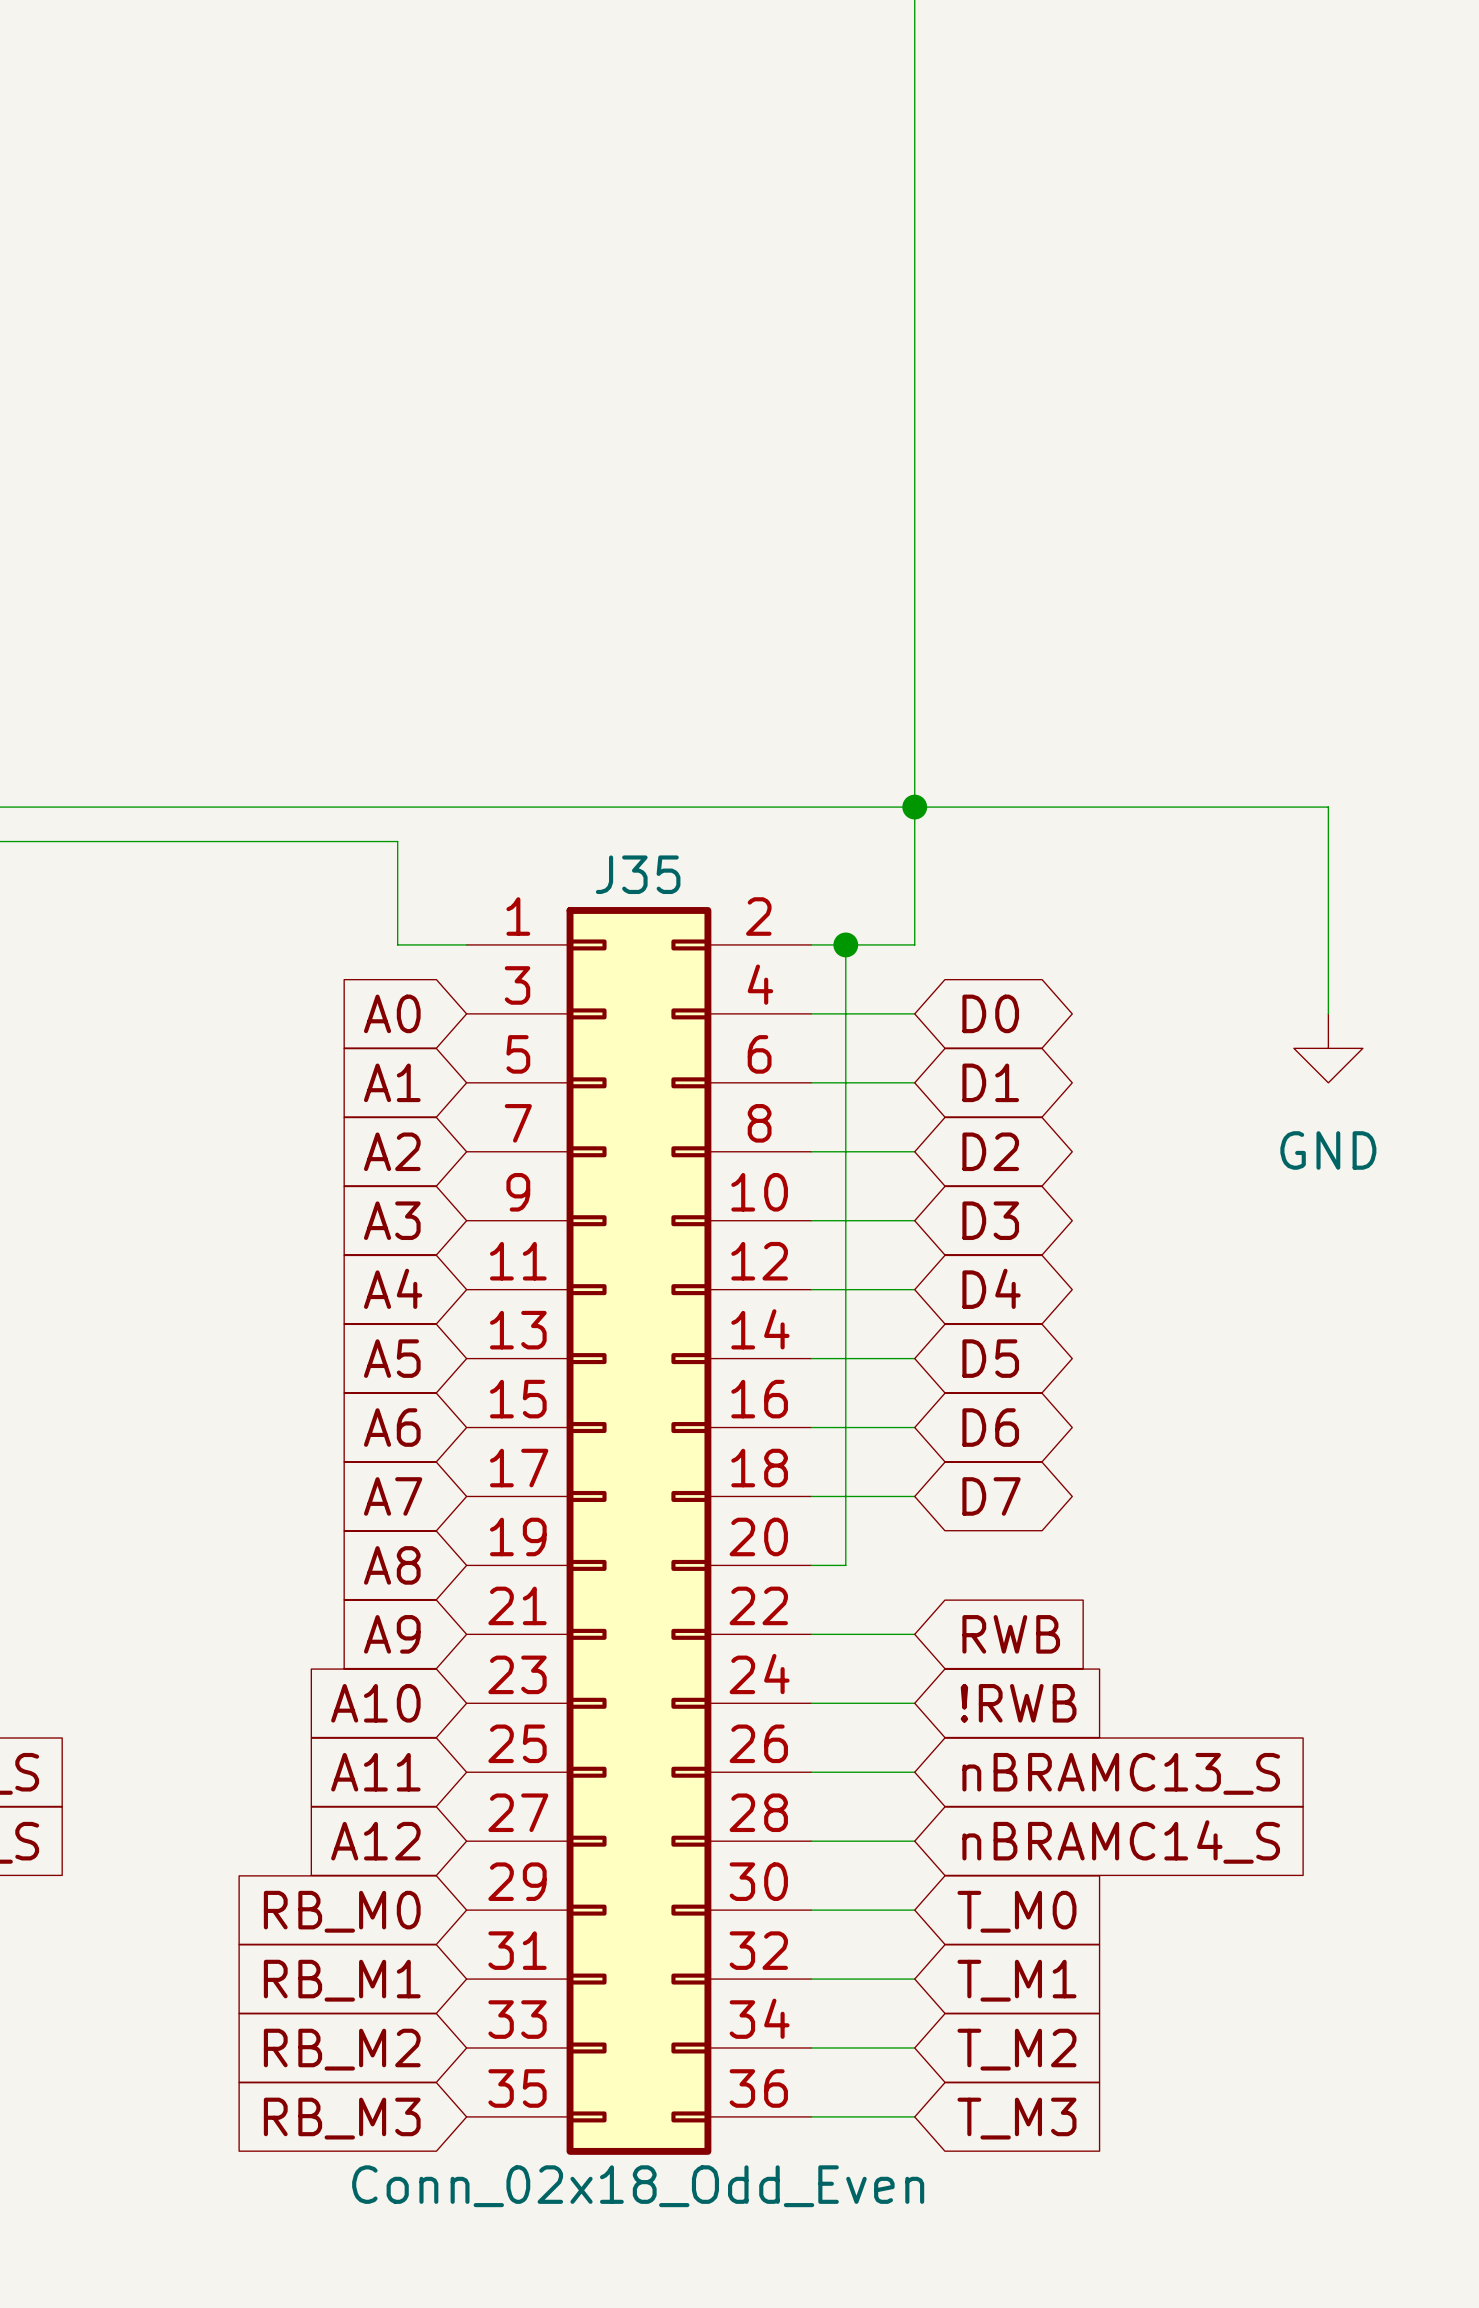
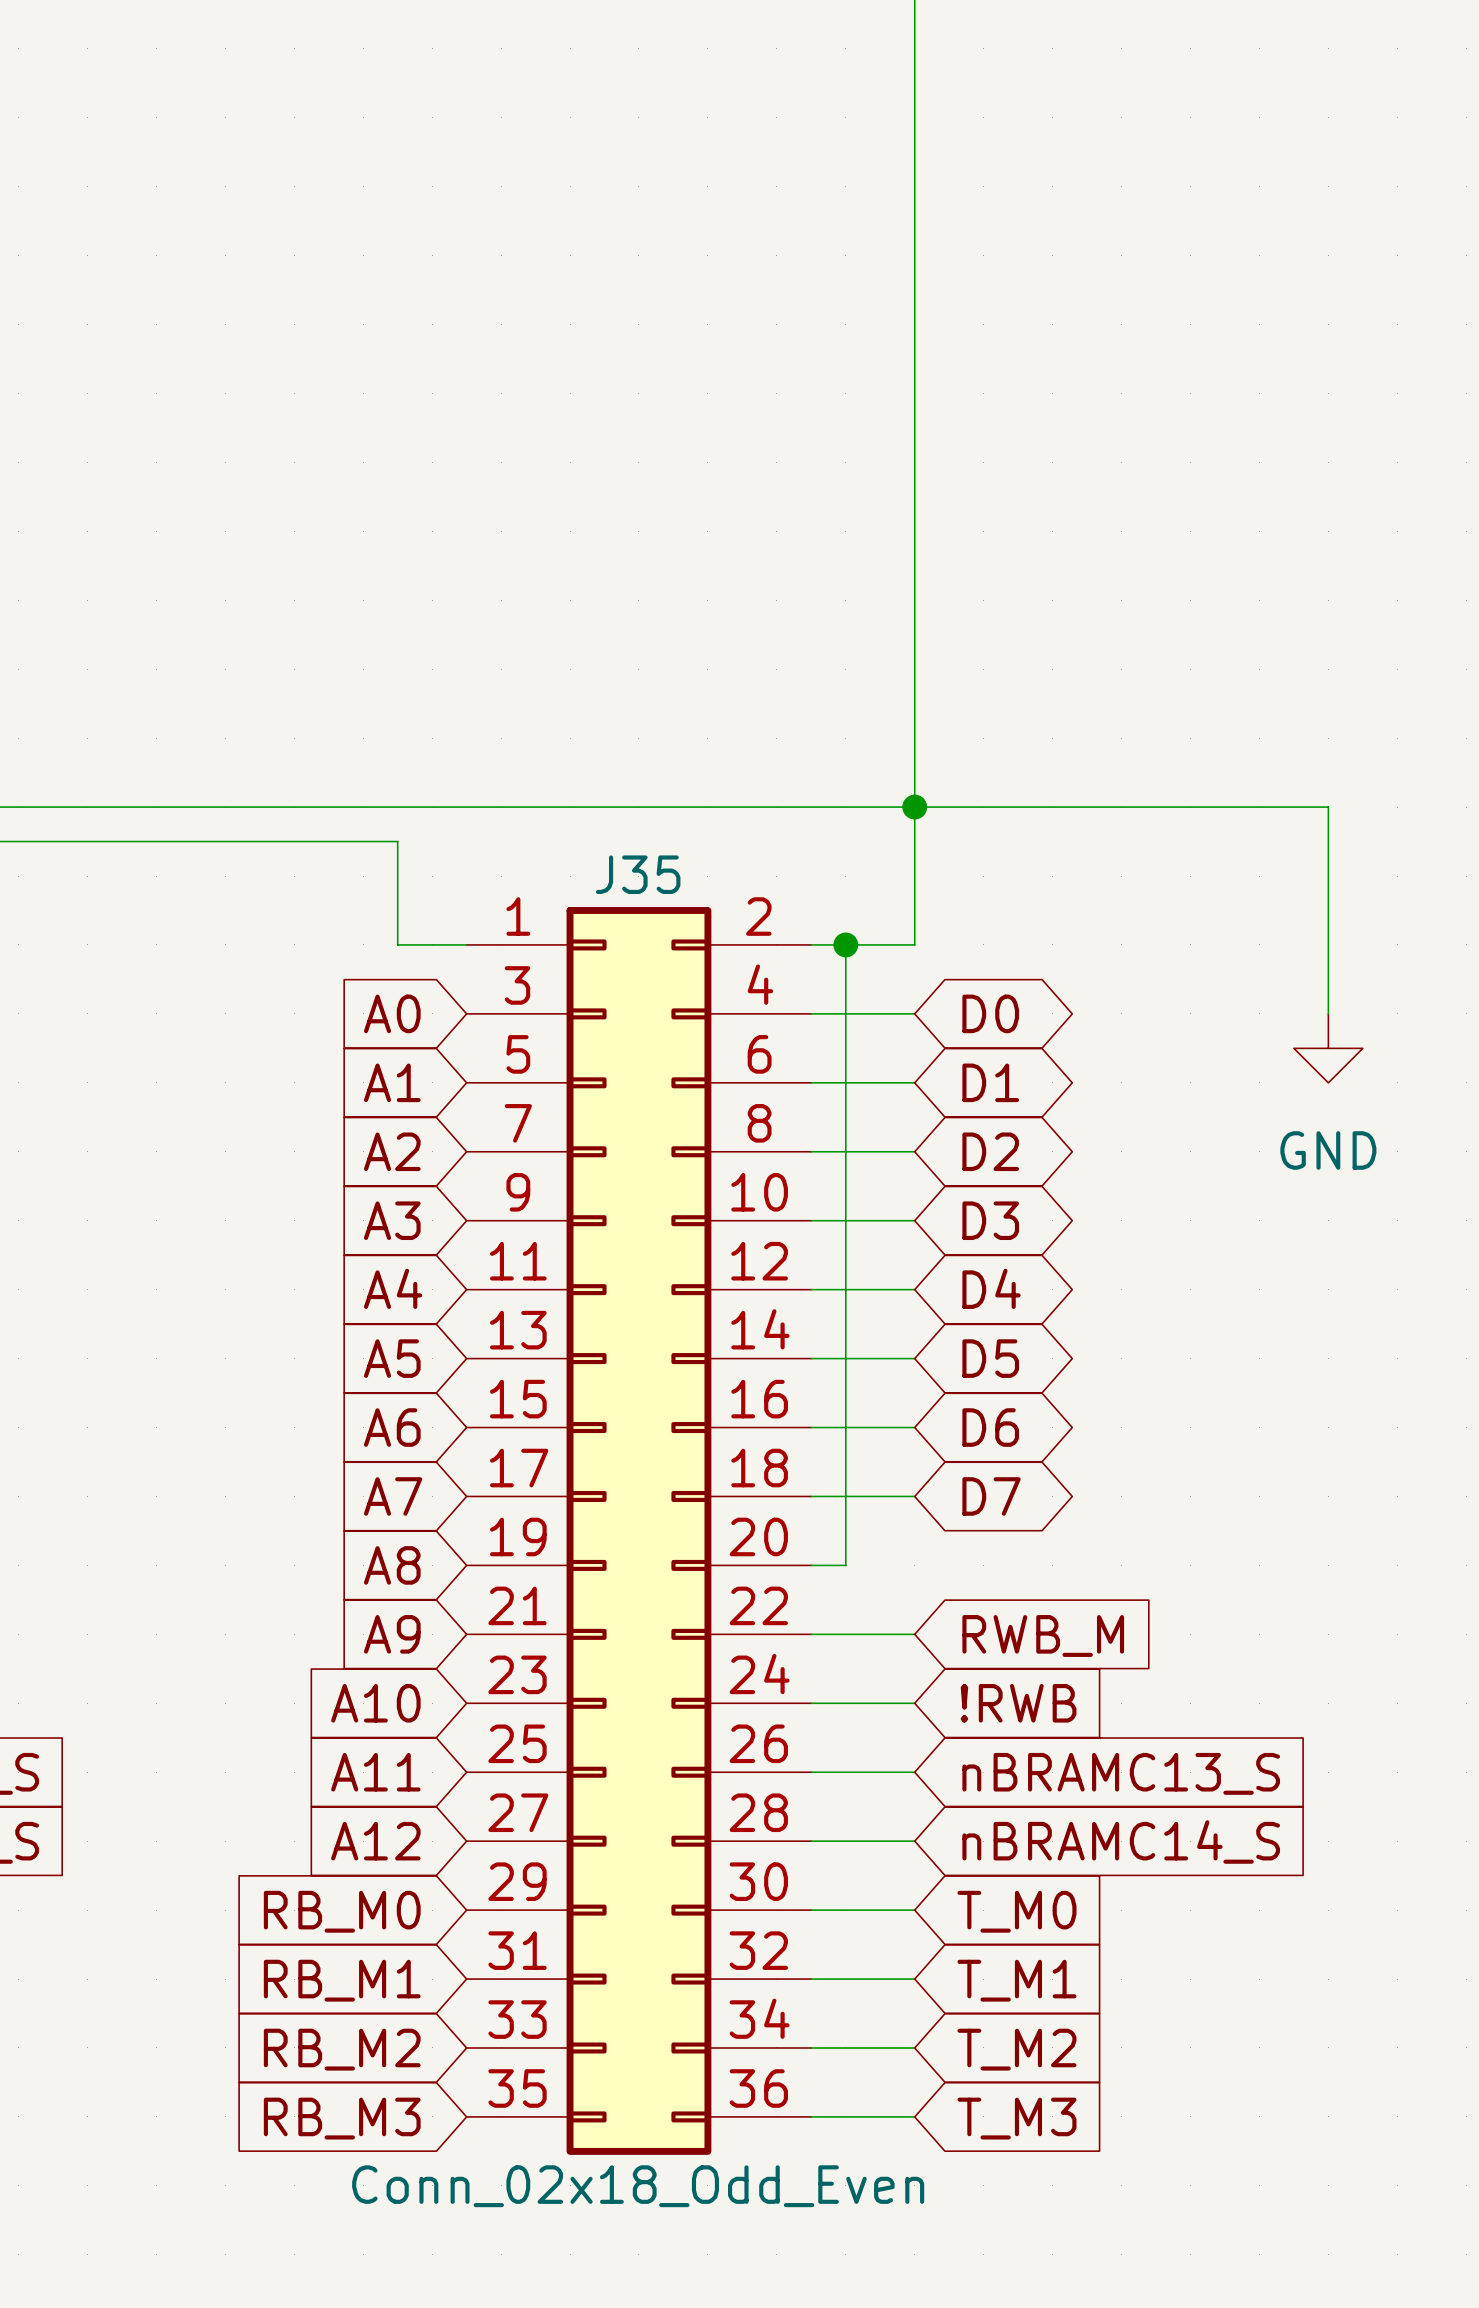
global label: RWB (1011, 1634) -> RWB_M (1043, 1635)

